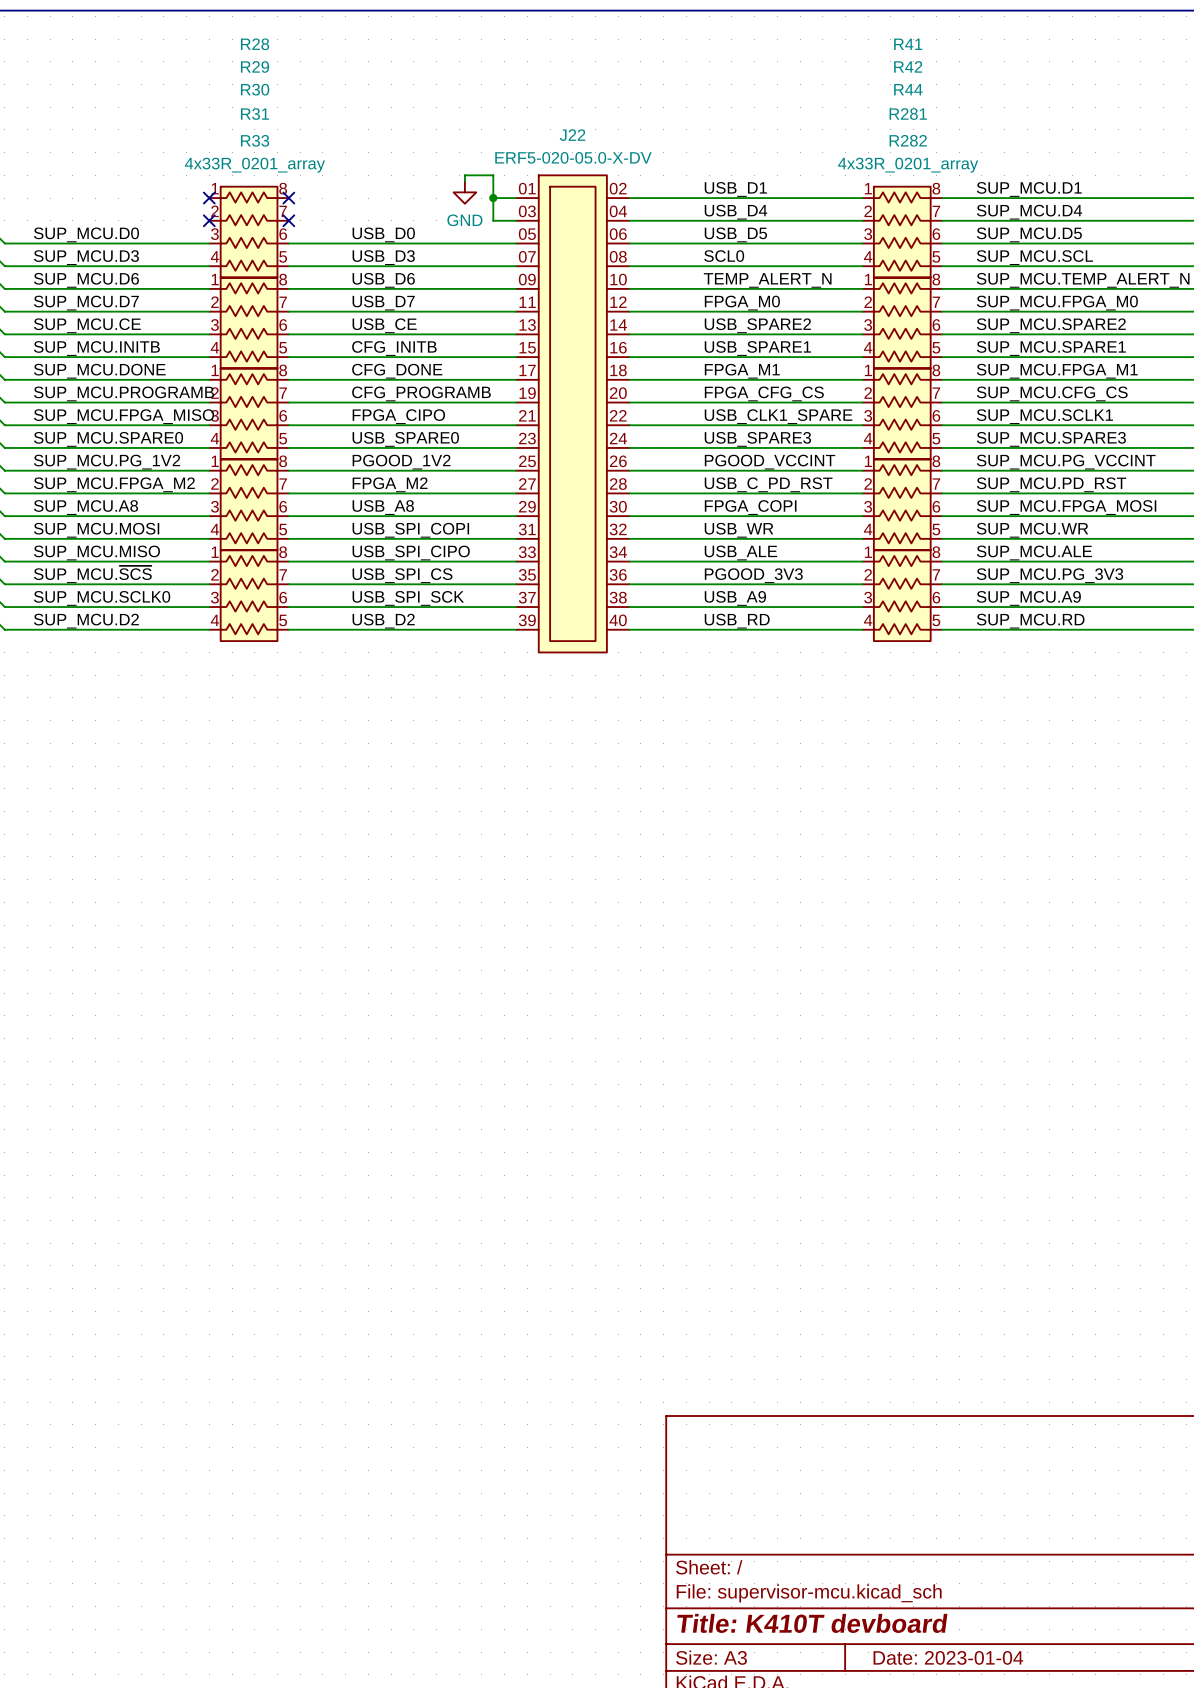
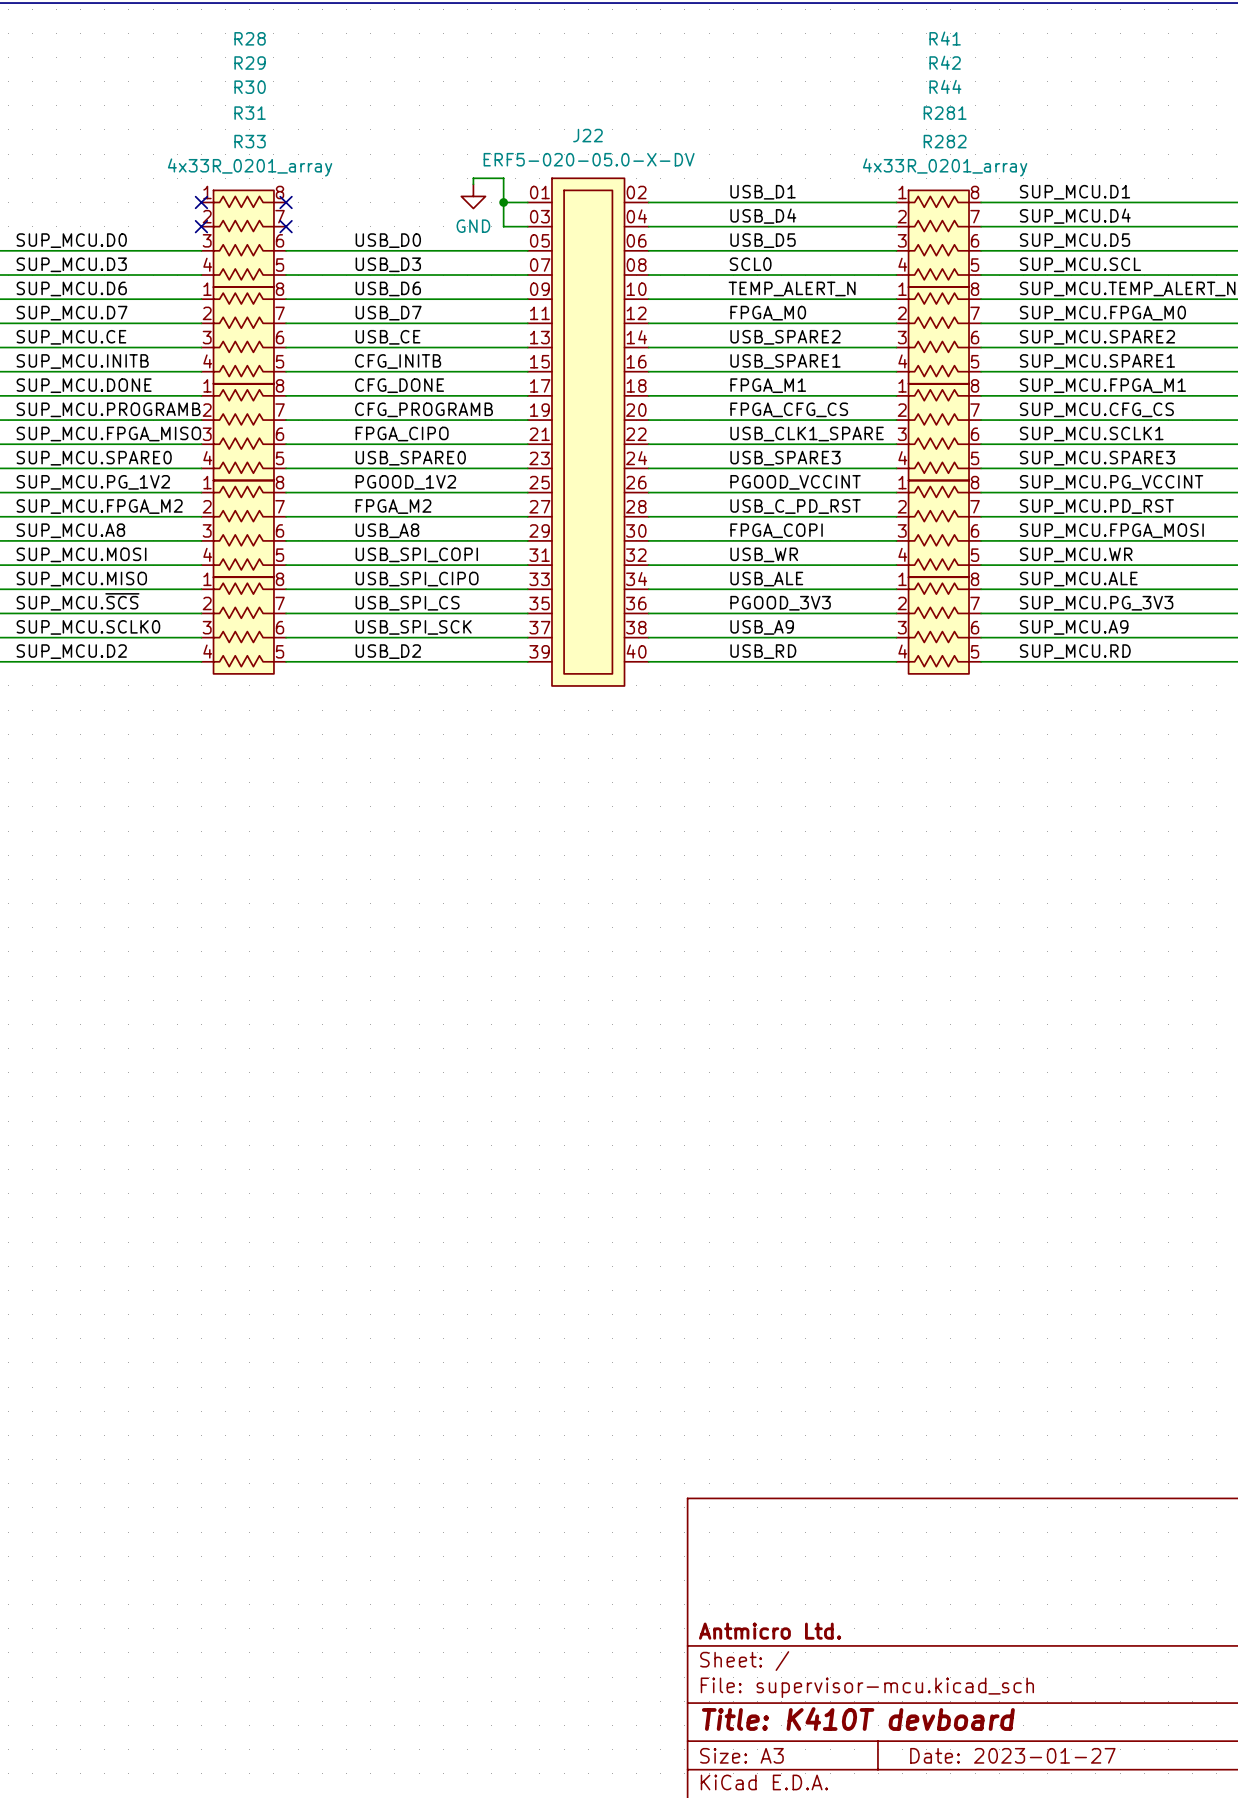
title block: none -> Antmicro Ltd. (770, 1631)
title block: Date: 2023-01-04 (948, 1657) -> Date: 2023-01-27 (1012, 1755)

